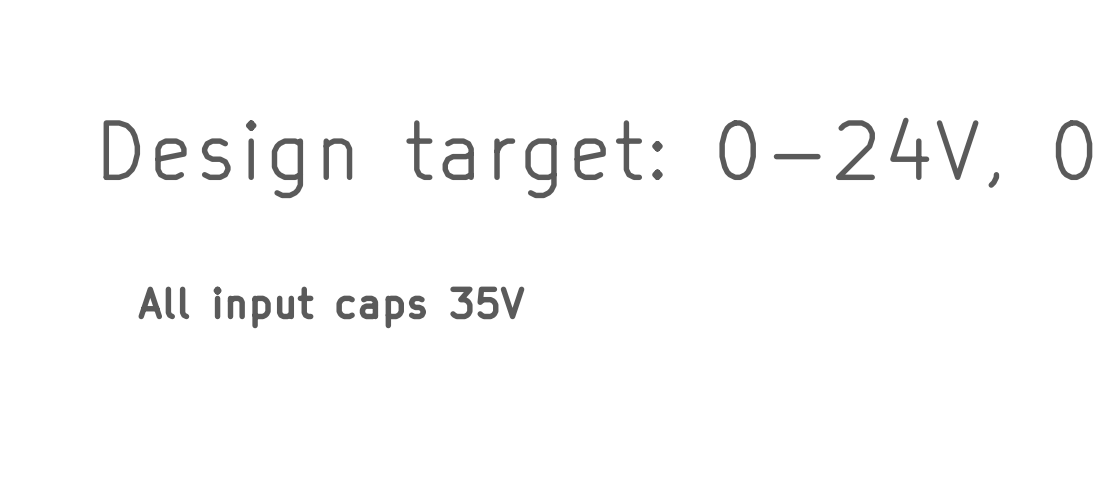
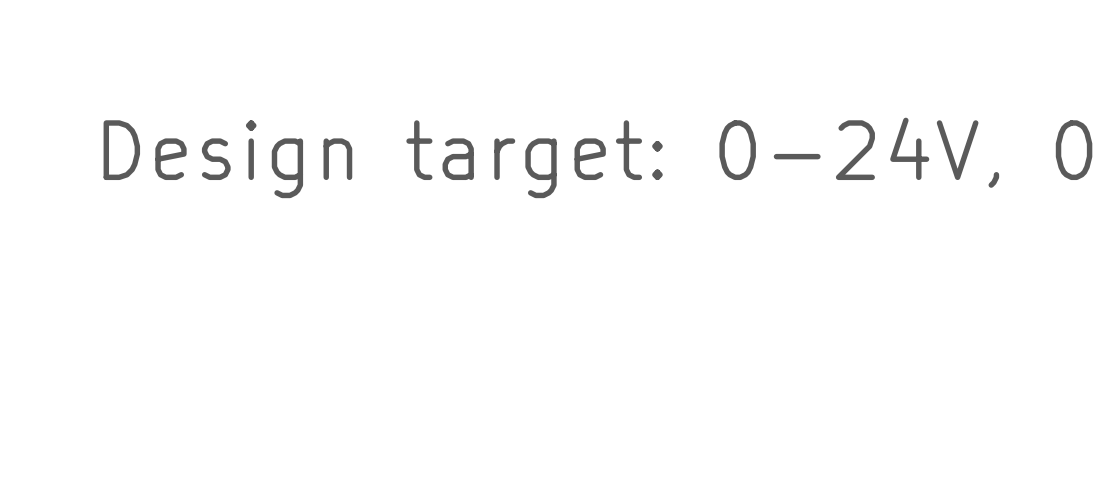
text: All input caps 35V (331, 307) -> none

